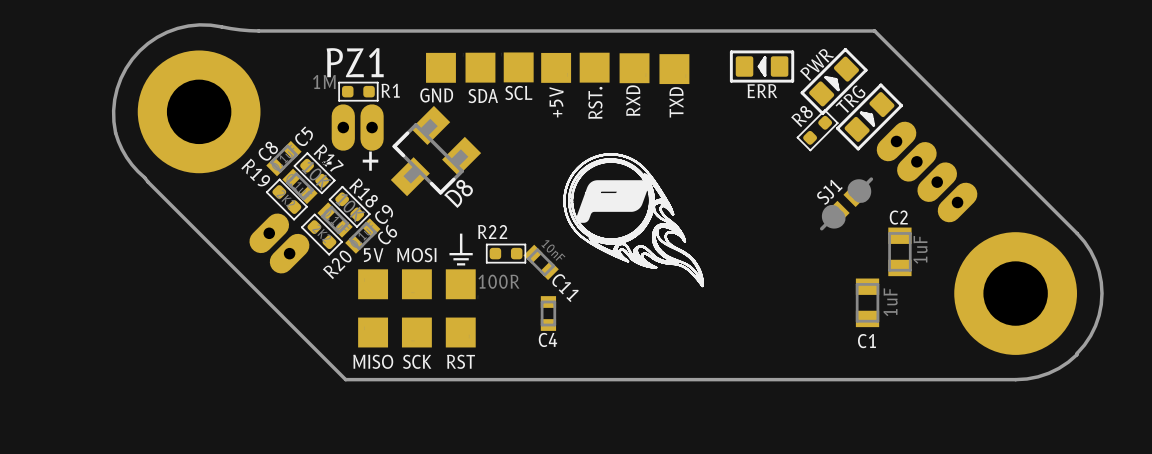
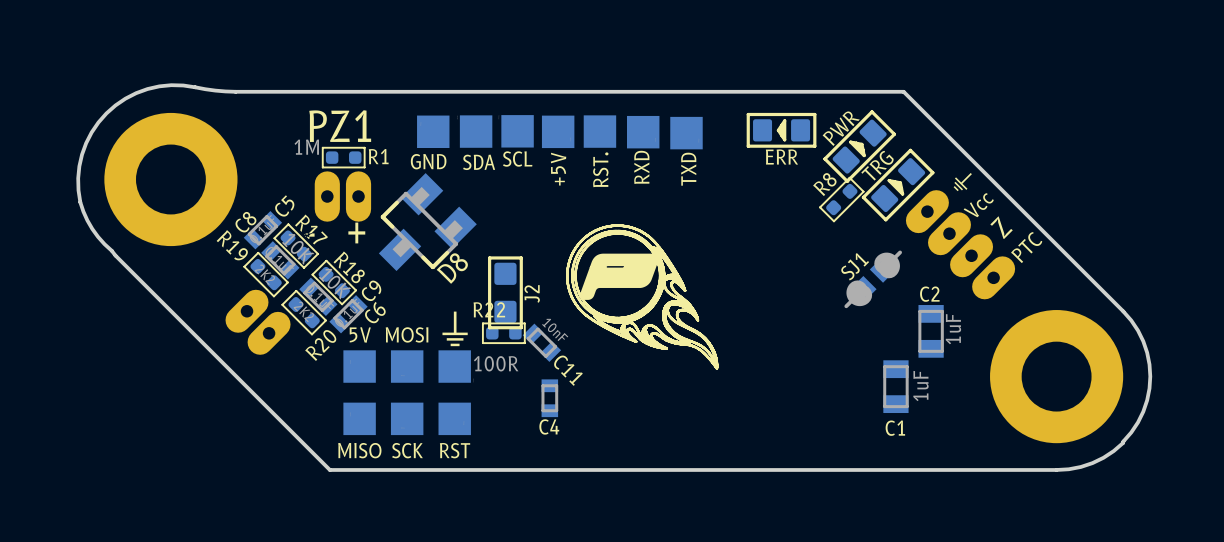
text: none -> ⏚ (962, 182)
text: none -> Vcc (978, 205)
text: none -> Z (1001, 227)
text: none -> PTC (1026, 247)
J2: none -> (505, 292)

